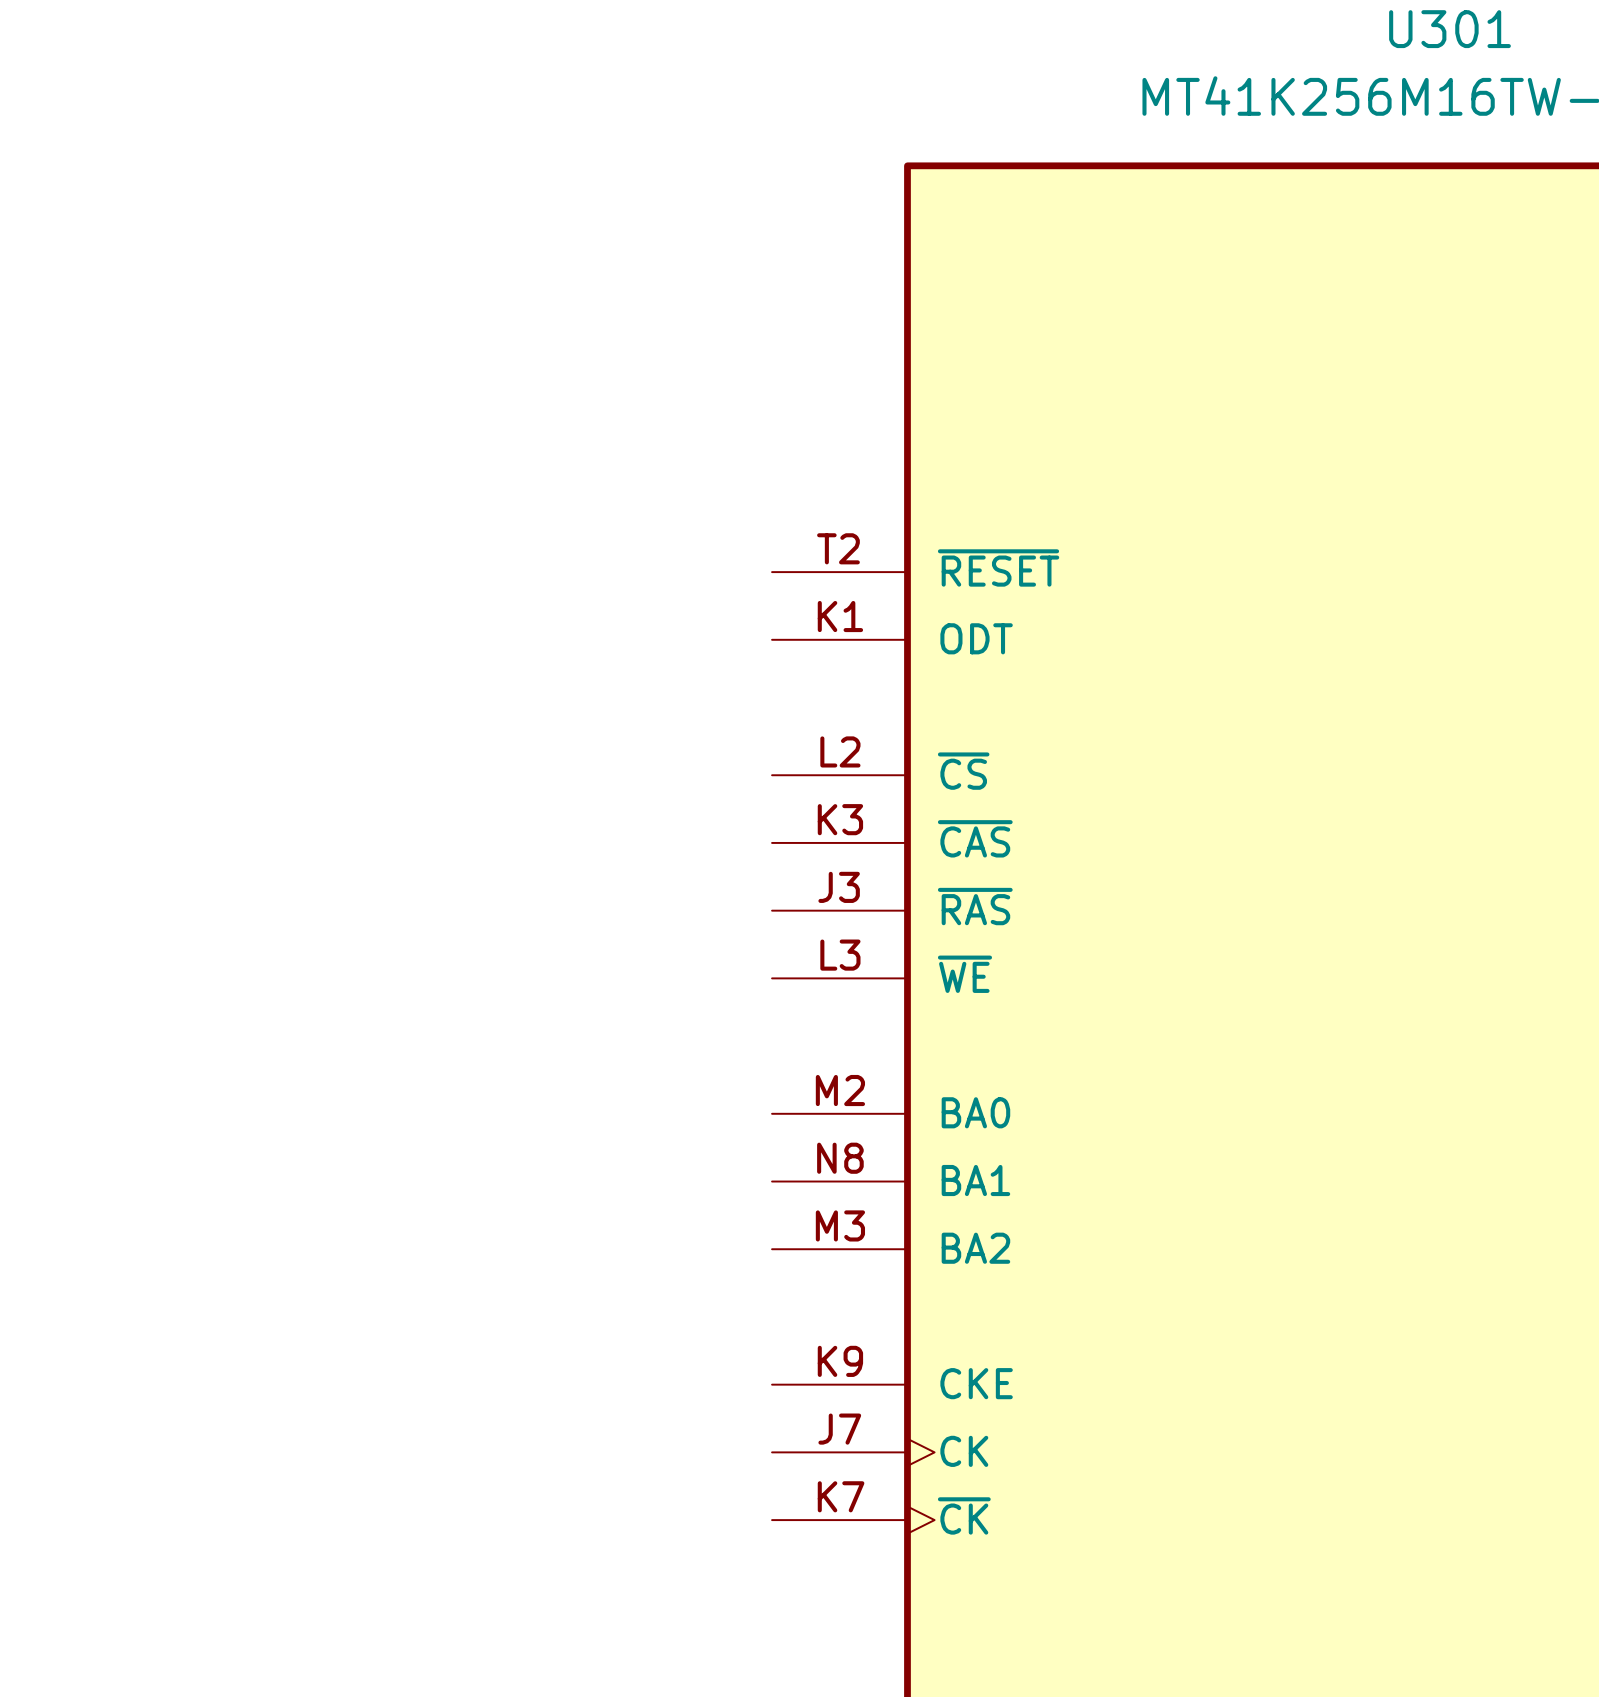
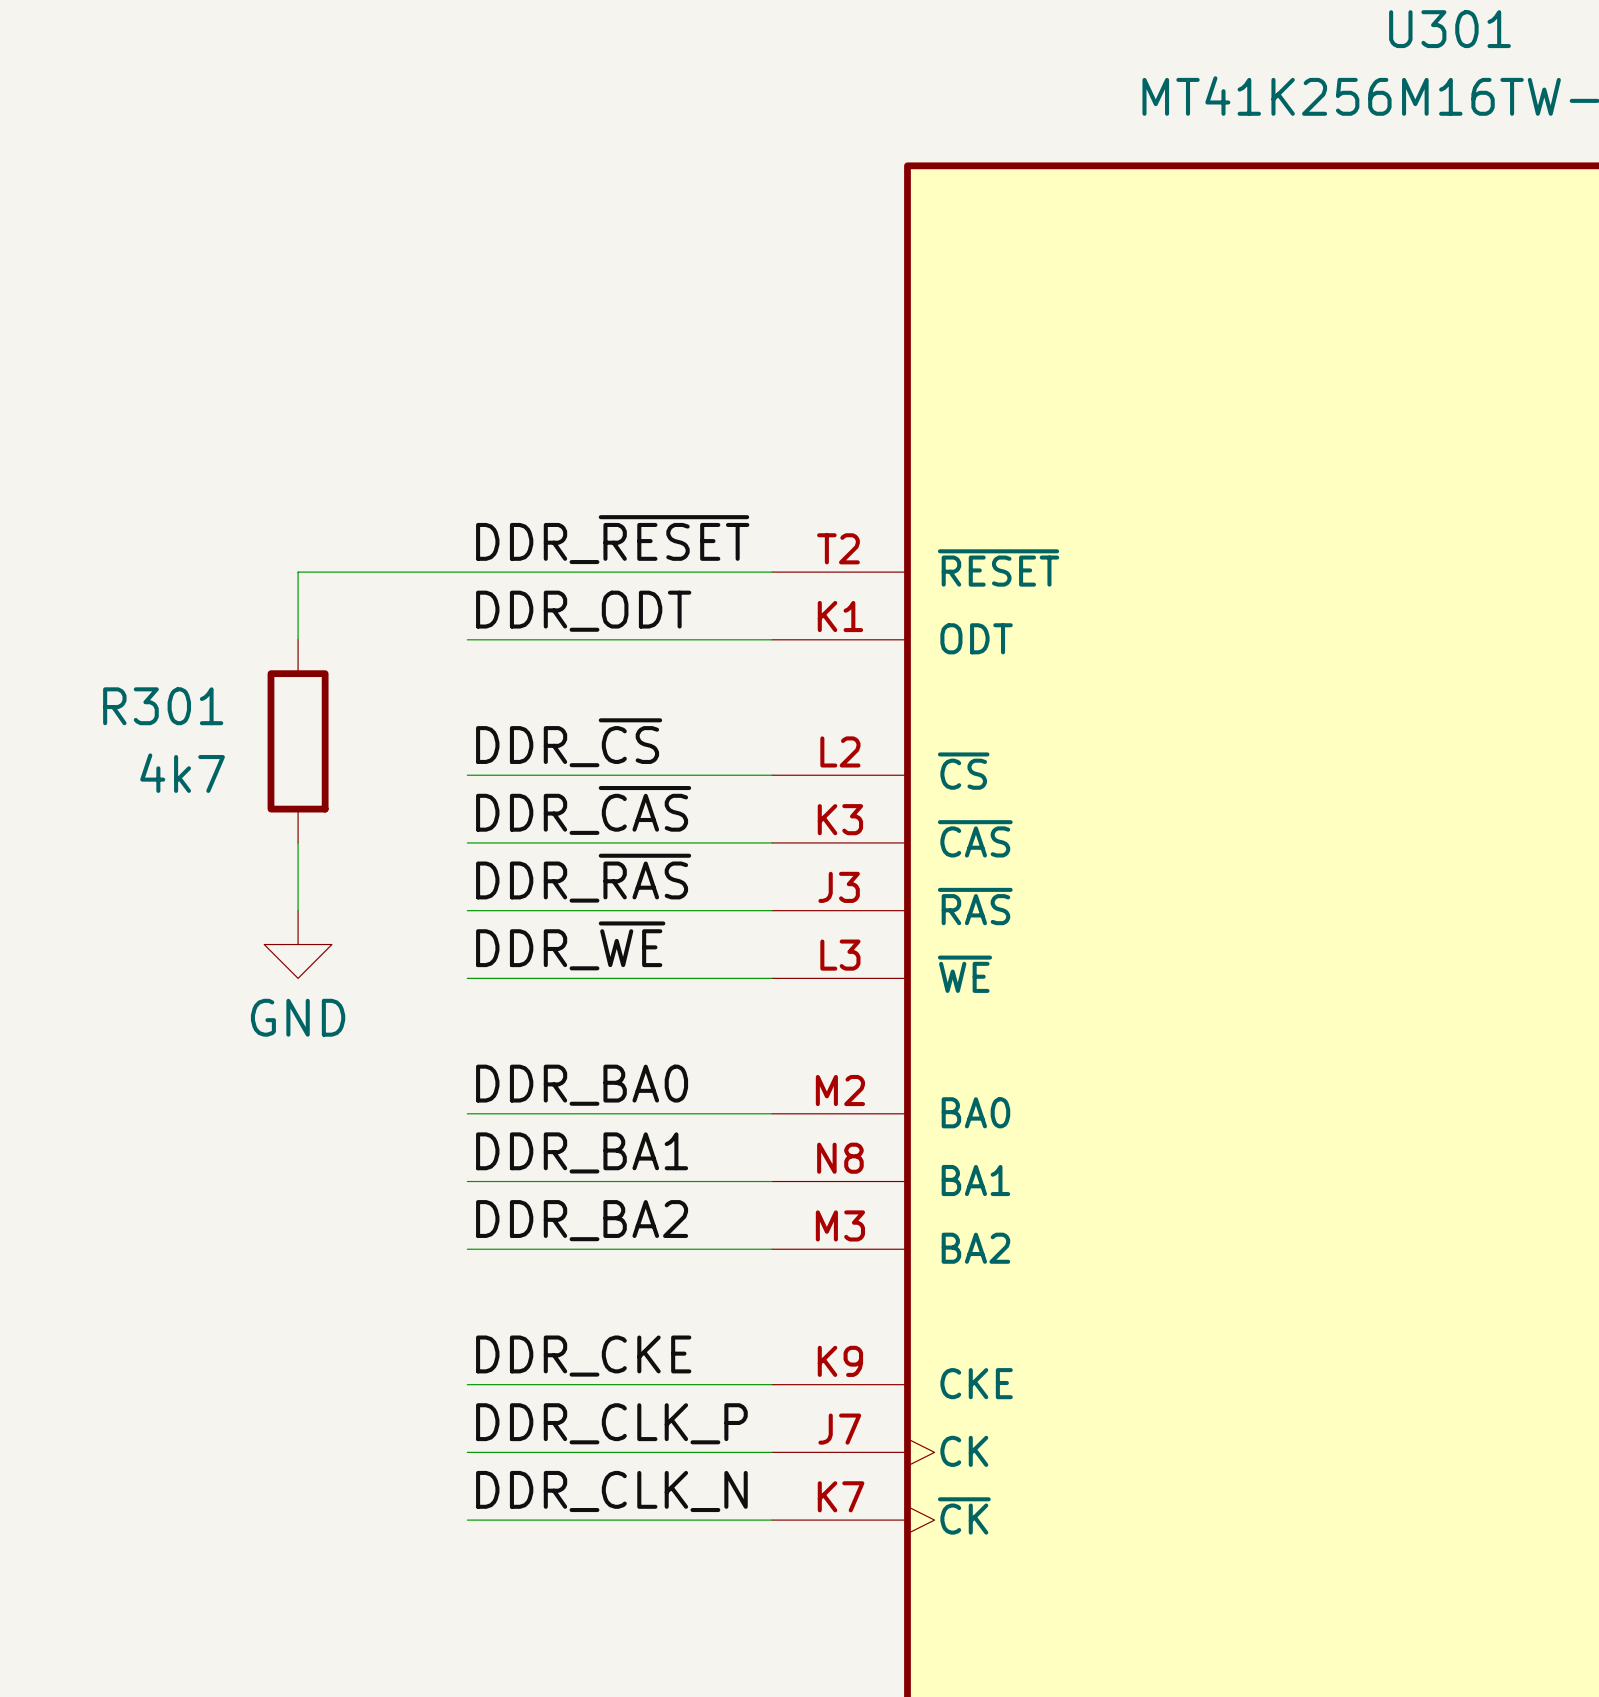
label: none -> DDR_~{RESET} (612, 539)
wire: none -> (772, 572) (298, 572) (298, 639)
label: none -> DDR_ODT (583, 611)
wire: none -> (467, 639) (772, 639)
R301: none -> 4k7 (298, 741)
label: none -> DDR_~{CS} (569, 742)
wire: none -> (467, 775) (772, 775)
label: none -> DDR_~{CAS} (583, 810)
wire: none -> (298, 842) (298, 910)
wire: none -> (467, 842) (772, 842)
label: none -> DDR_~{RAS} (583, 878)
wire: none -> (467, 910) (772, 910)
power symbol: none -> GND (298, 944)
label: none -> DDR_~{WE} (570, 945)
wire: none -> (467, 978) (772, 978)
label: none -> DDR_BA0 (582, 1085)
wire: none -> (467, 1113) (772, 1113)
label: none -> DDR_BA1 (582, 1152)
wire: none -> (467, 1181) (772, 1181)
label: none -> DDR_BA2 (582, 1220)
wire: none -> (467, 1249) (772, 1249)
label: none -> DDR_CKE (583, 1356)
wire: none -> (467, 1384) (772, 1384)
label: none -> DDR_CLK_P (611, 1423)
wire: none -> (467, 1452) (772, 1452)
label: none -> DDR_CLK_N (611, 1491)
wire: none -> (467, 1520) (772, 1520)

